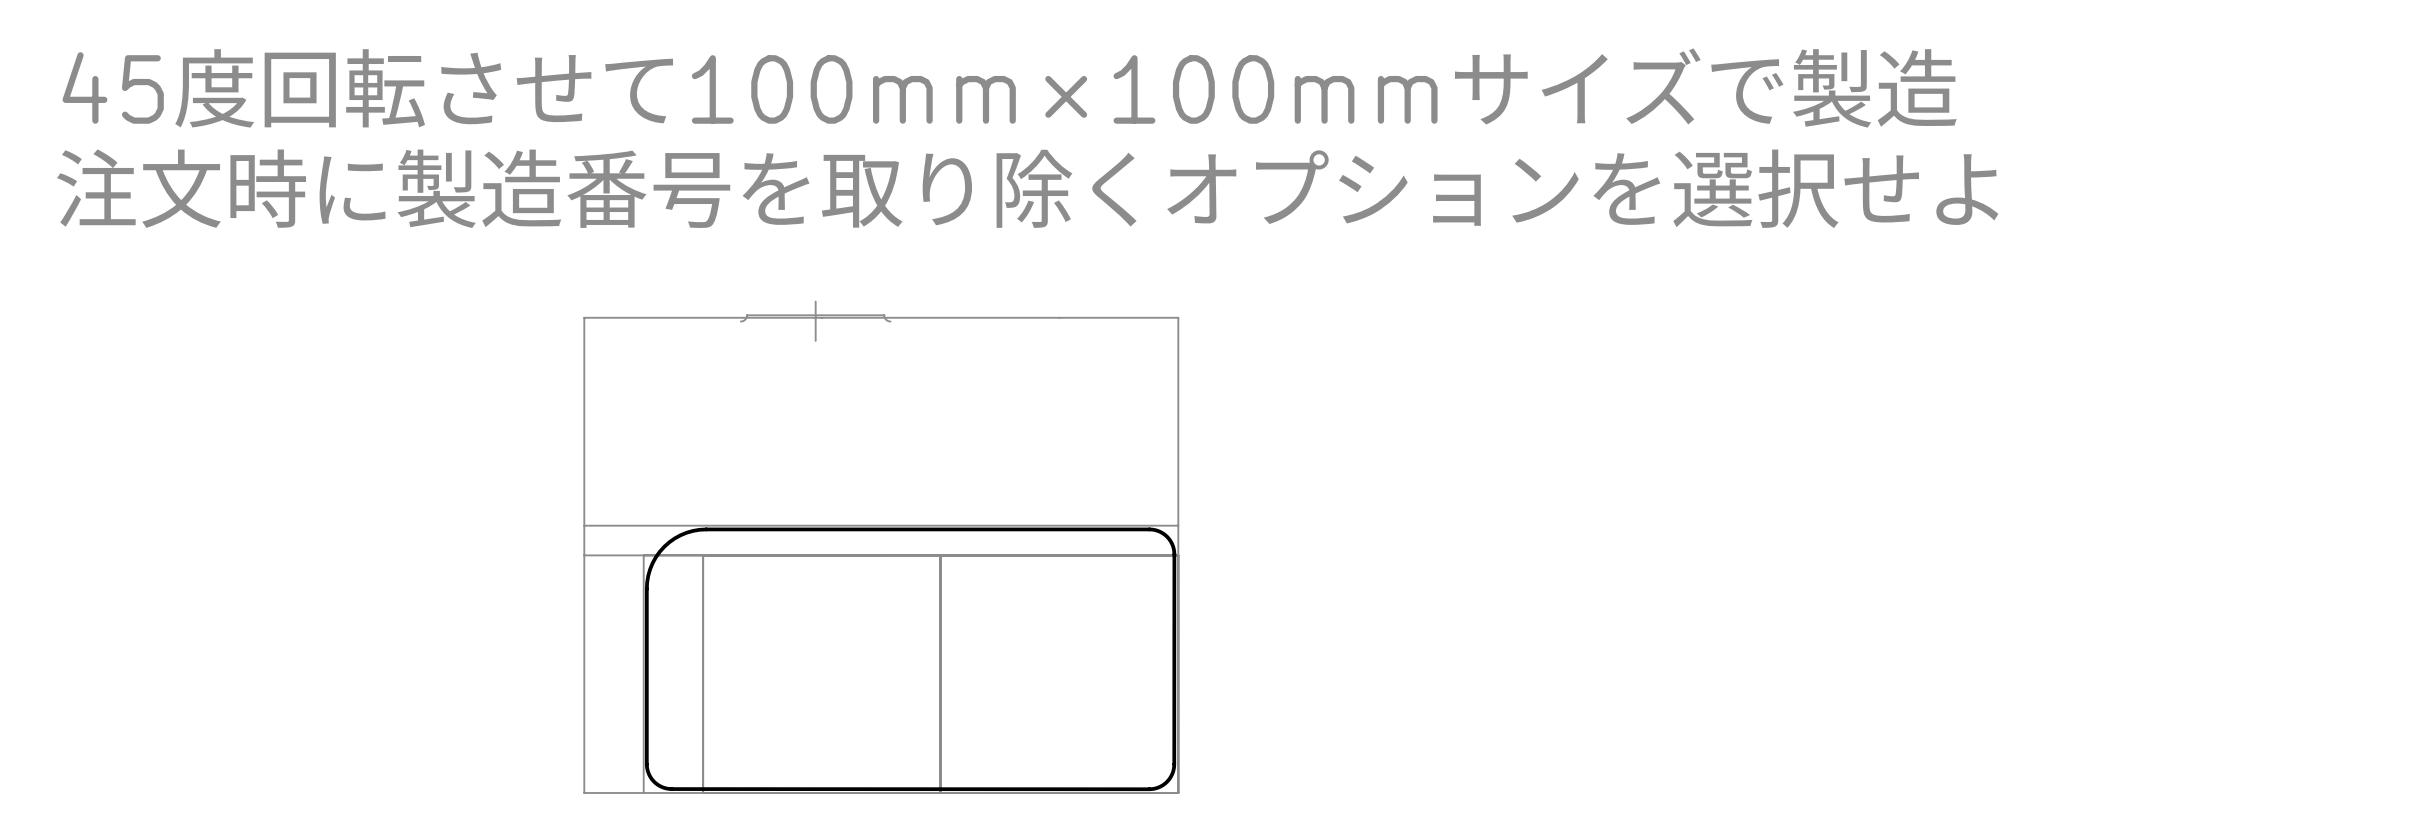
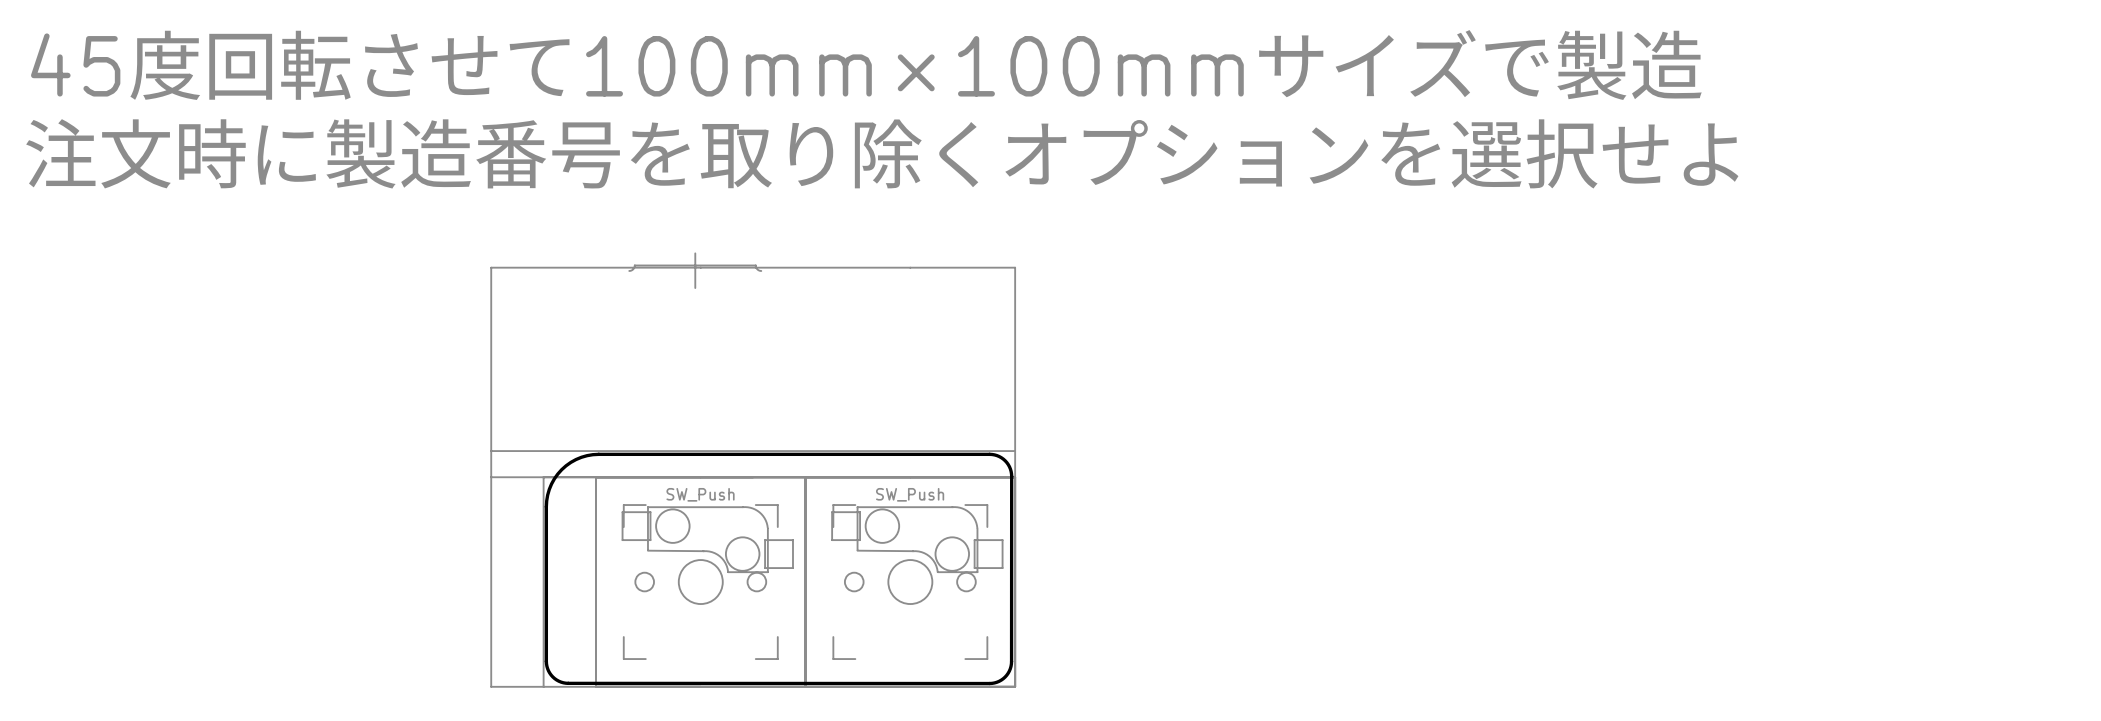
drawing: none -> [595, 476, 1016, 688]

